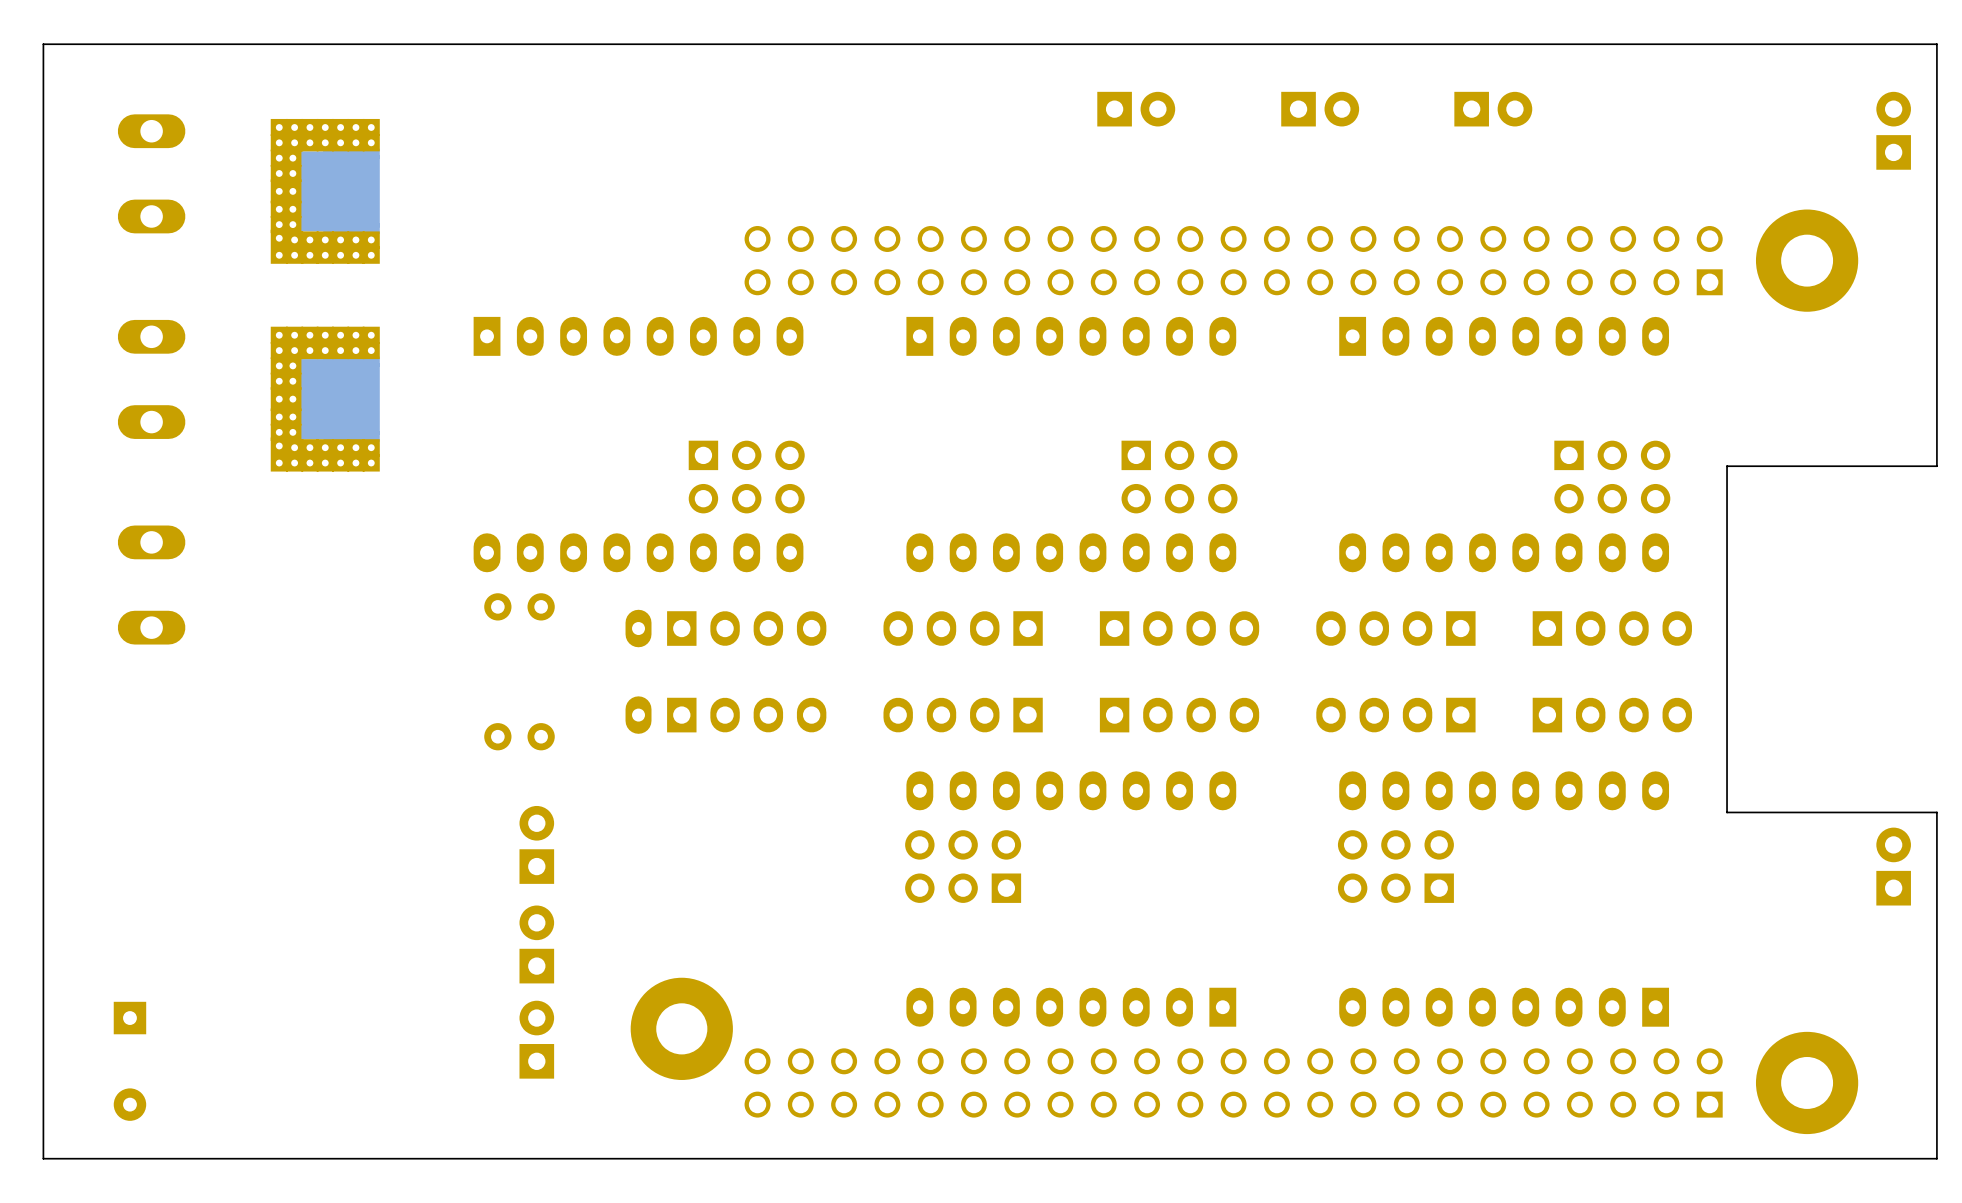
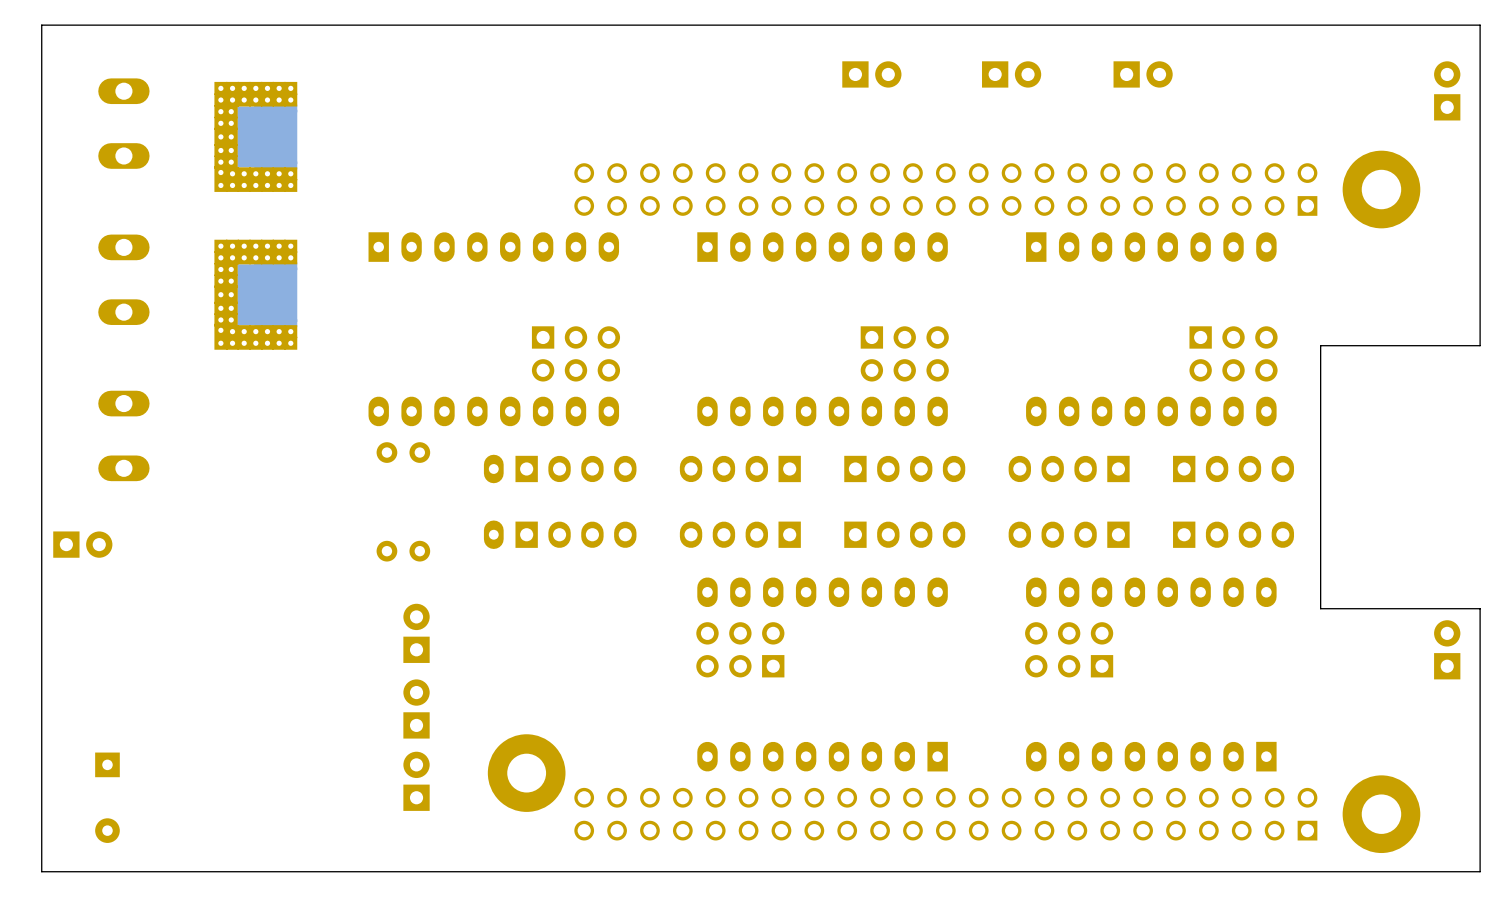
part: none -> (82, 544)

